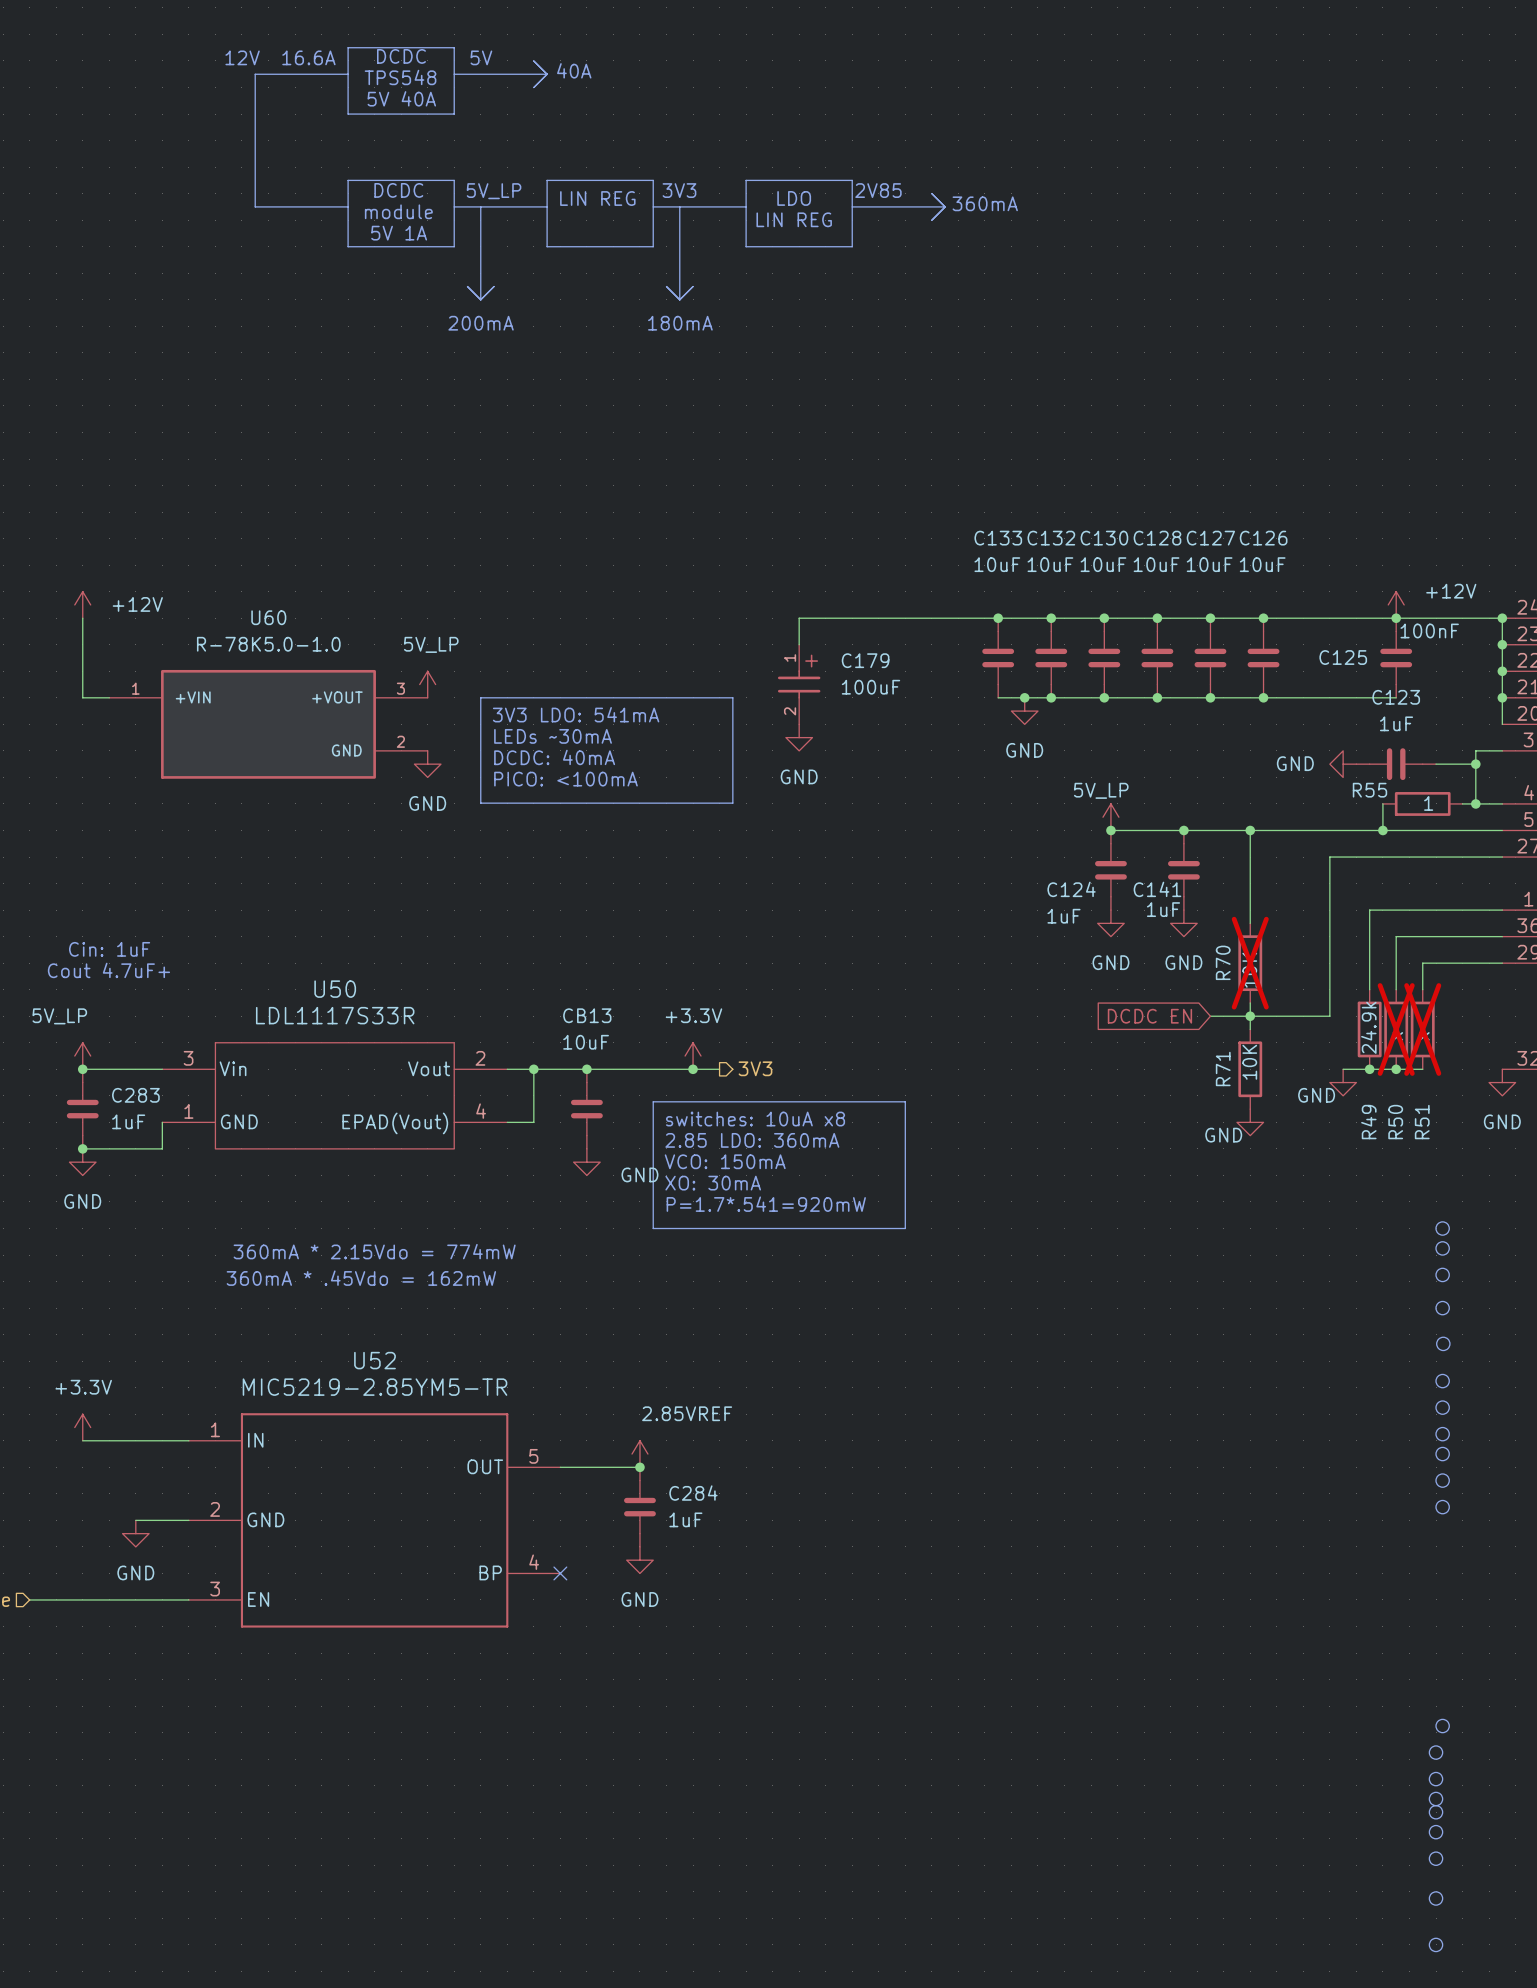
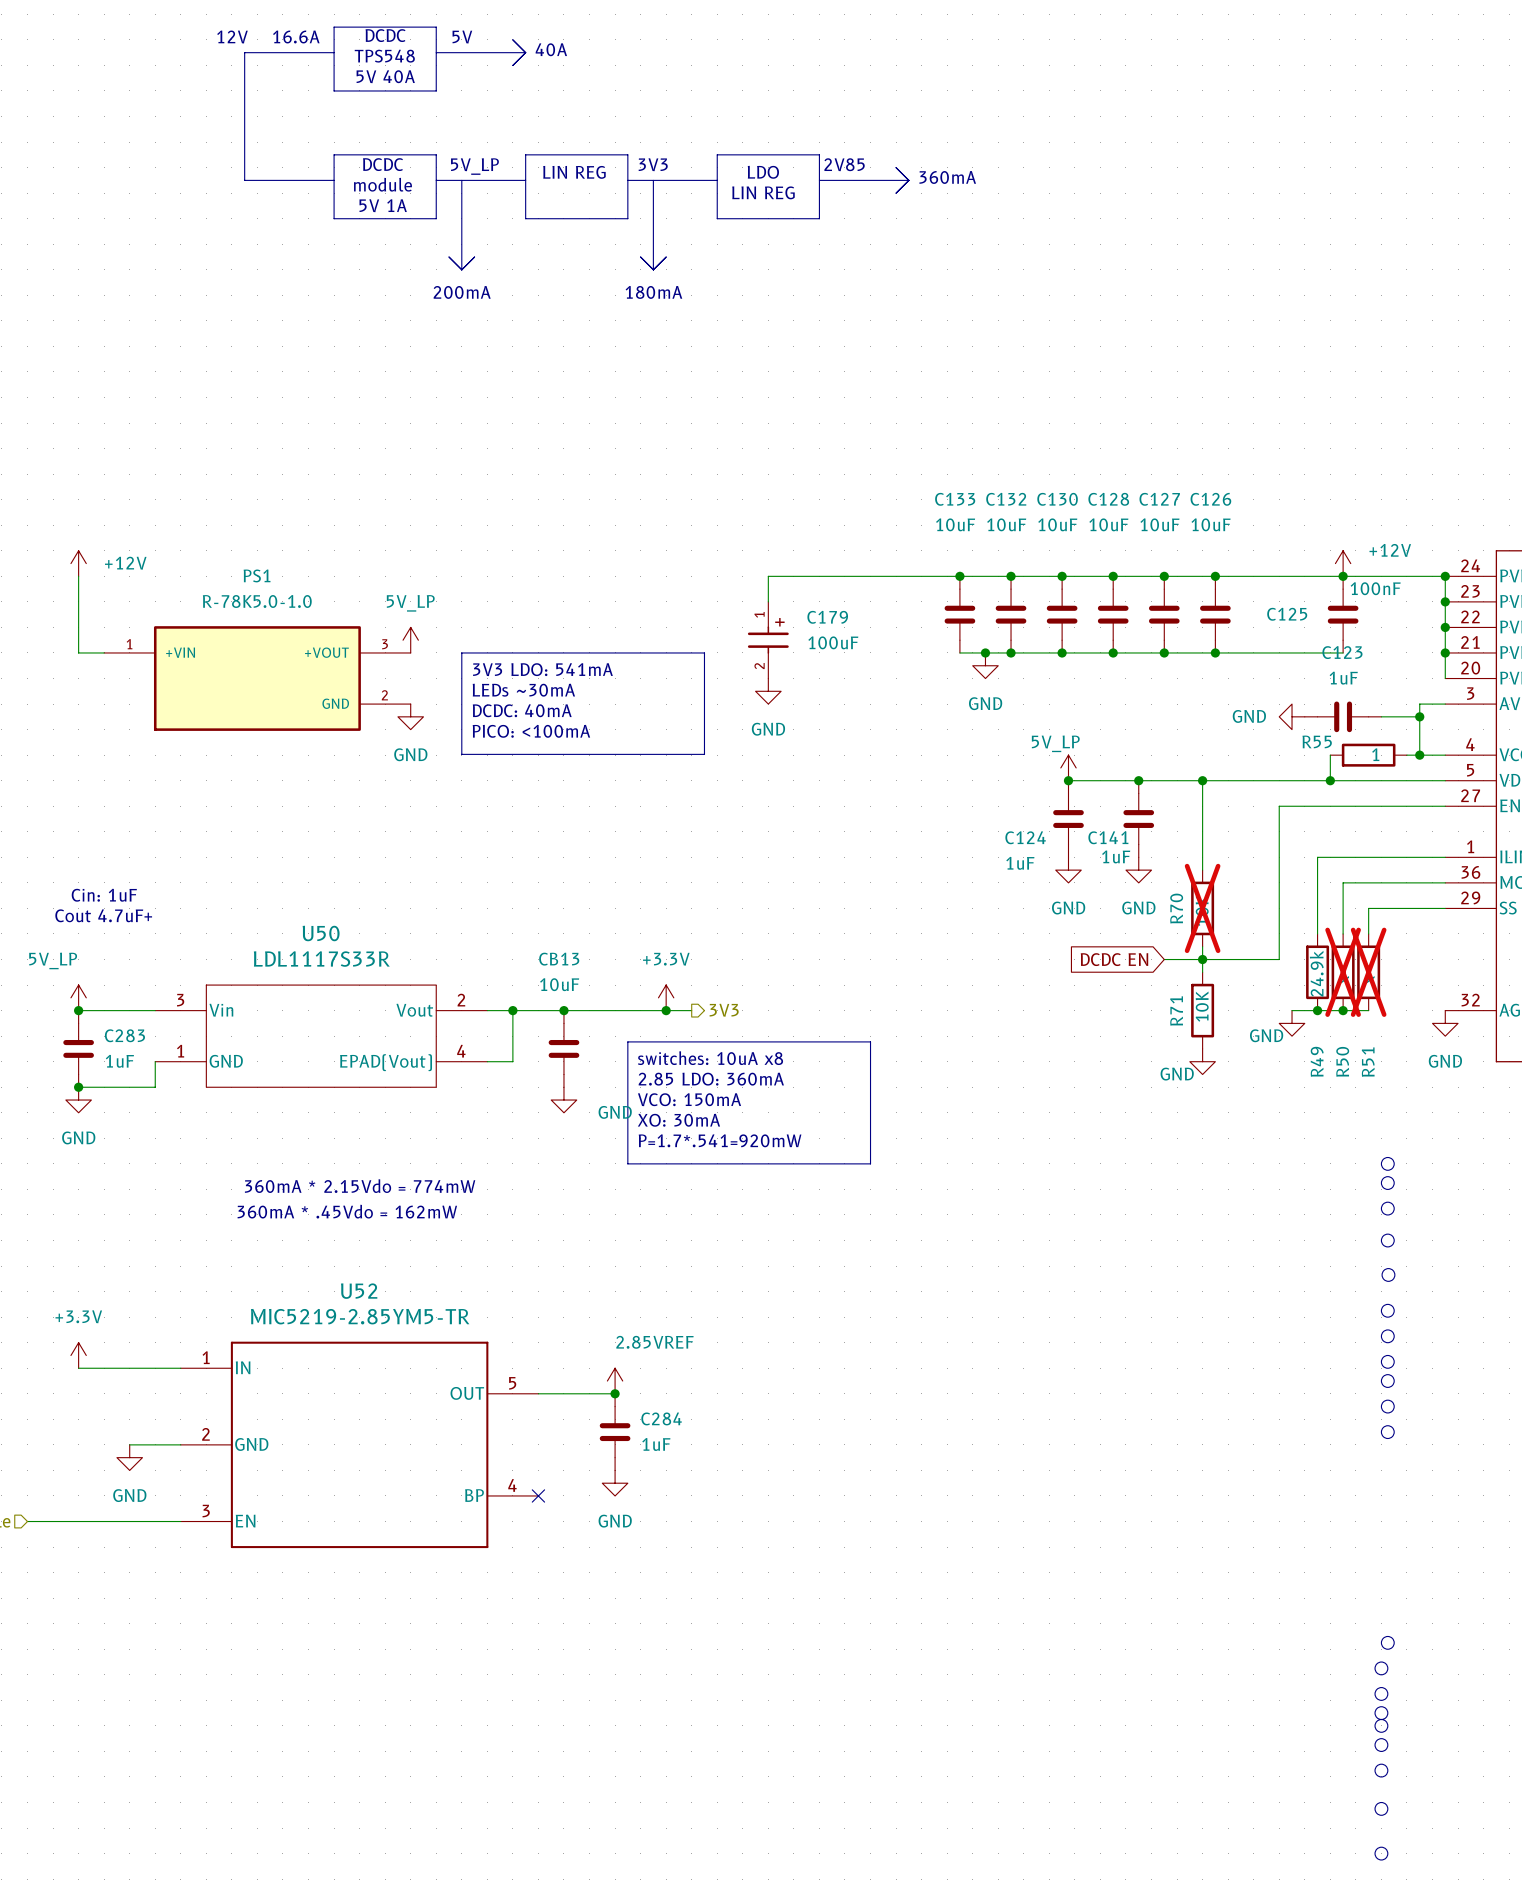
U60 name: U60 (268, 617) -> PS1 (257, 575)

